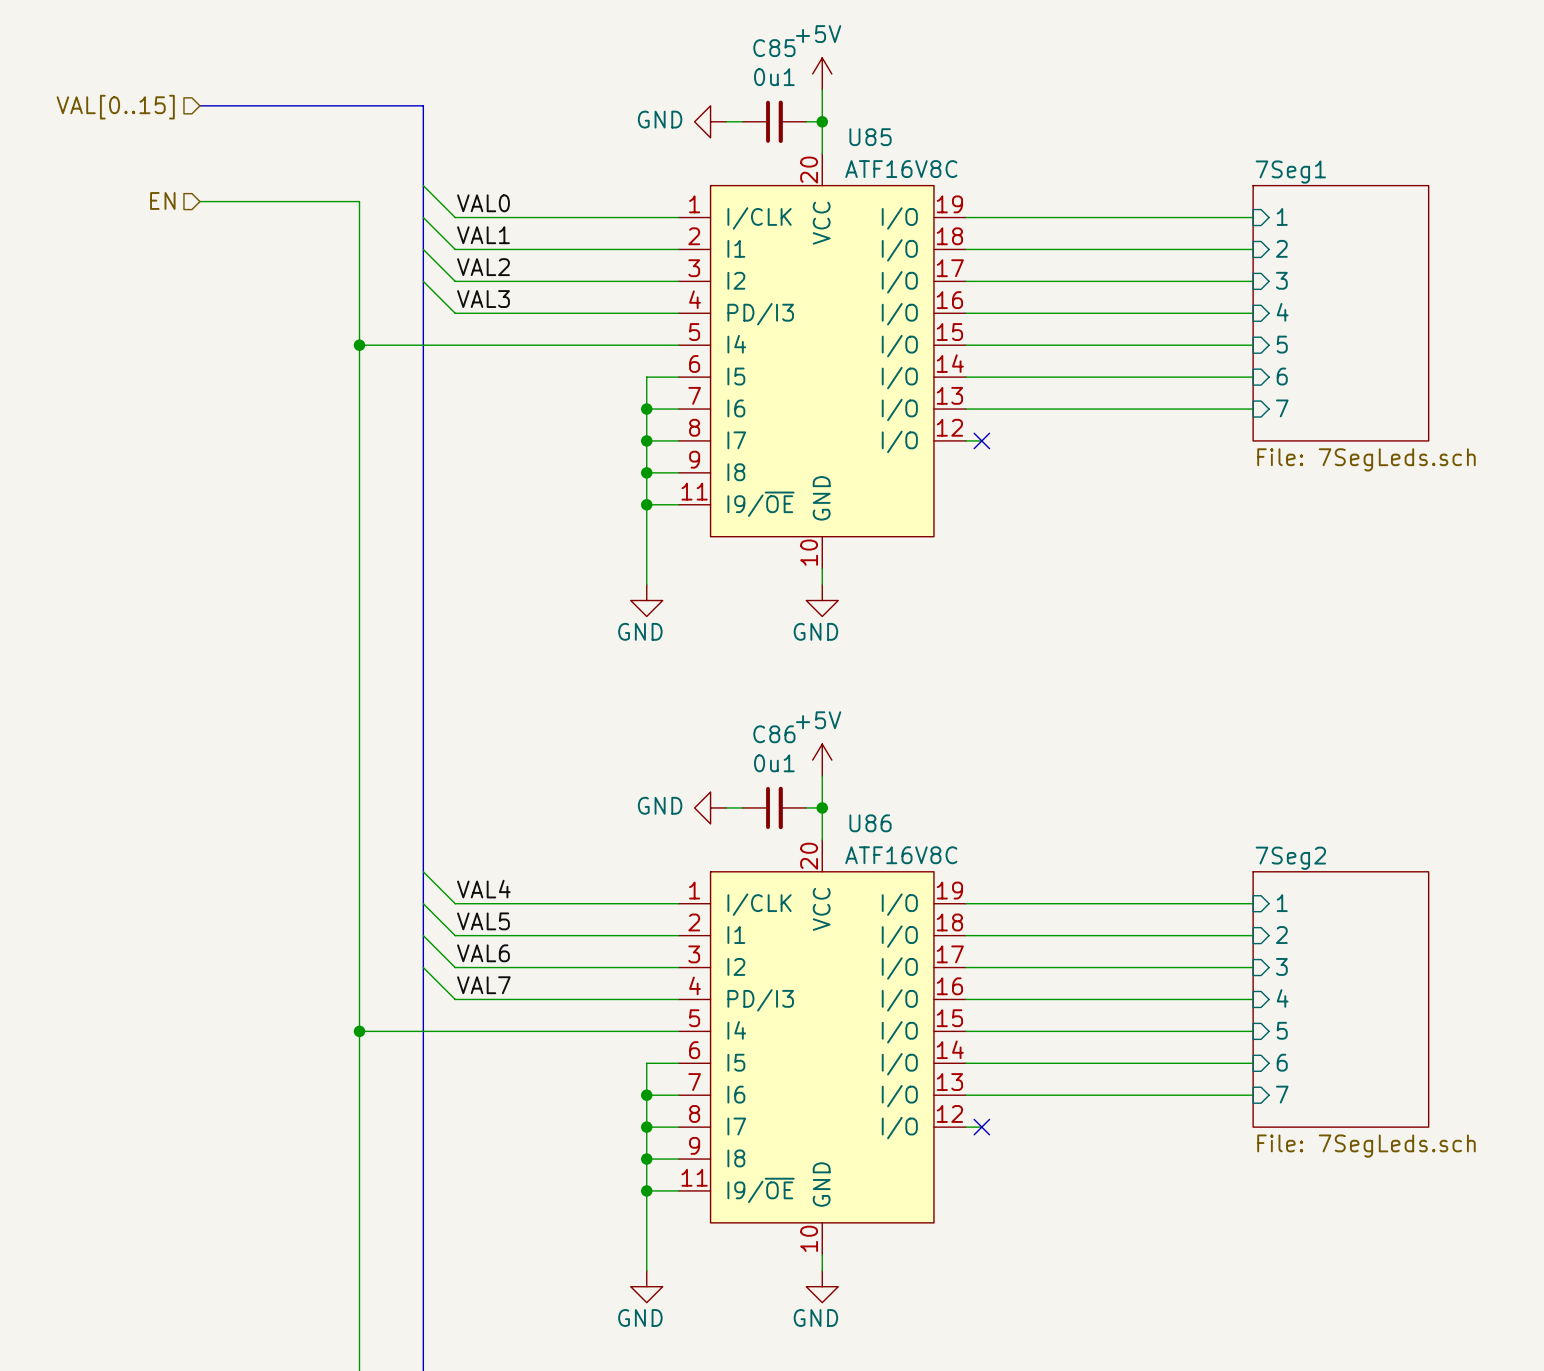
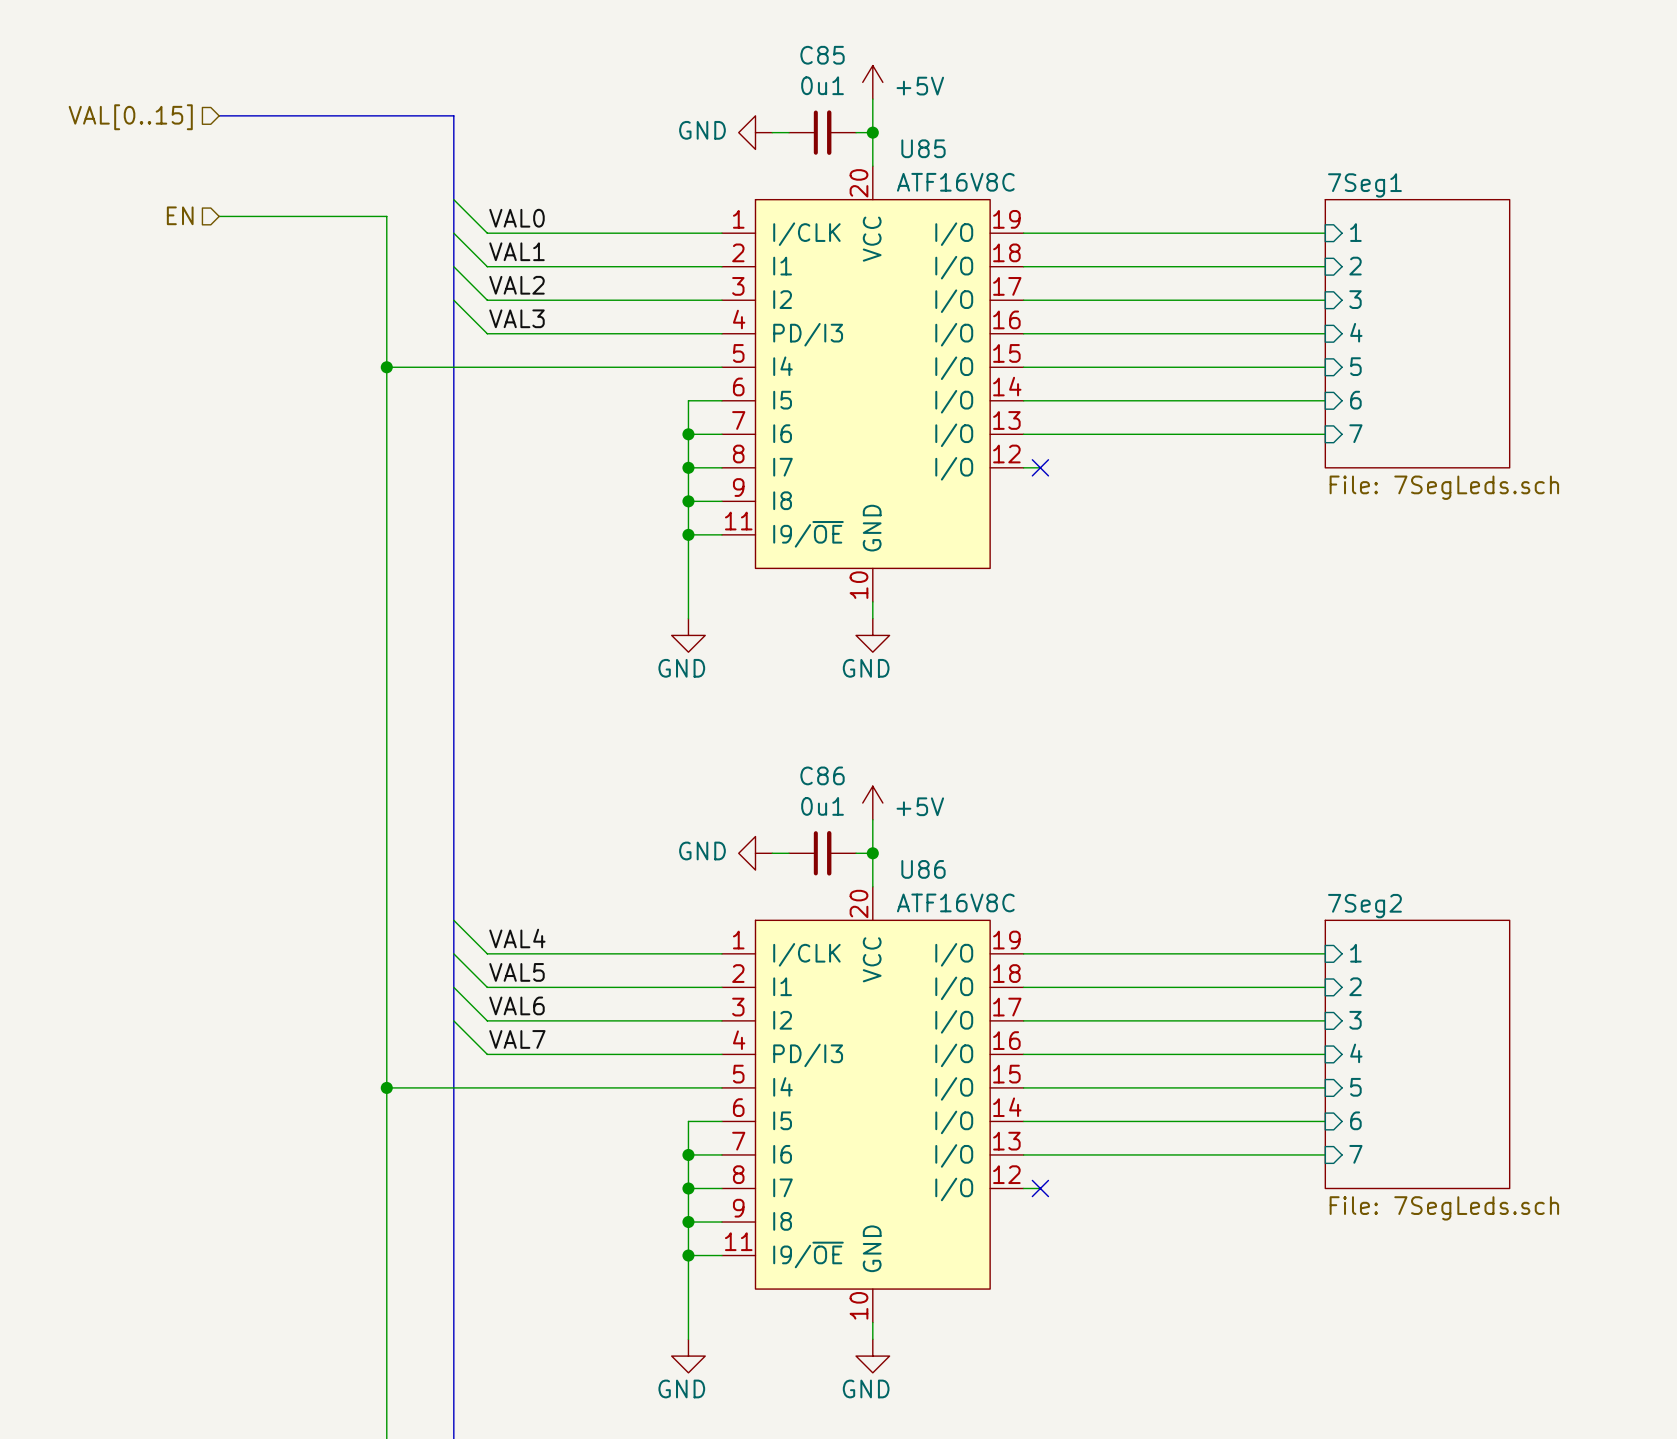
power symbol text position: +5V (818, 34) -> +5V (920, 86)
power symbol text position: +5V (818, 720) -> +5V (920, 806)

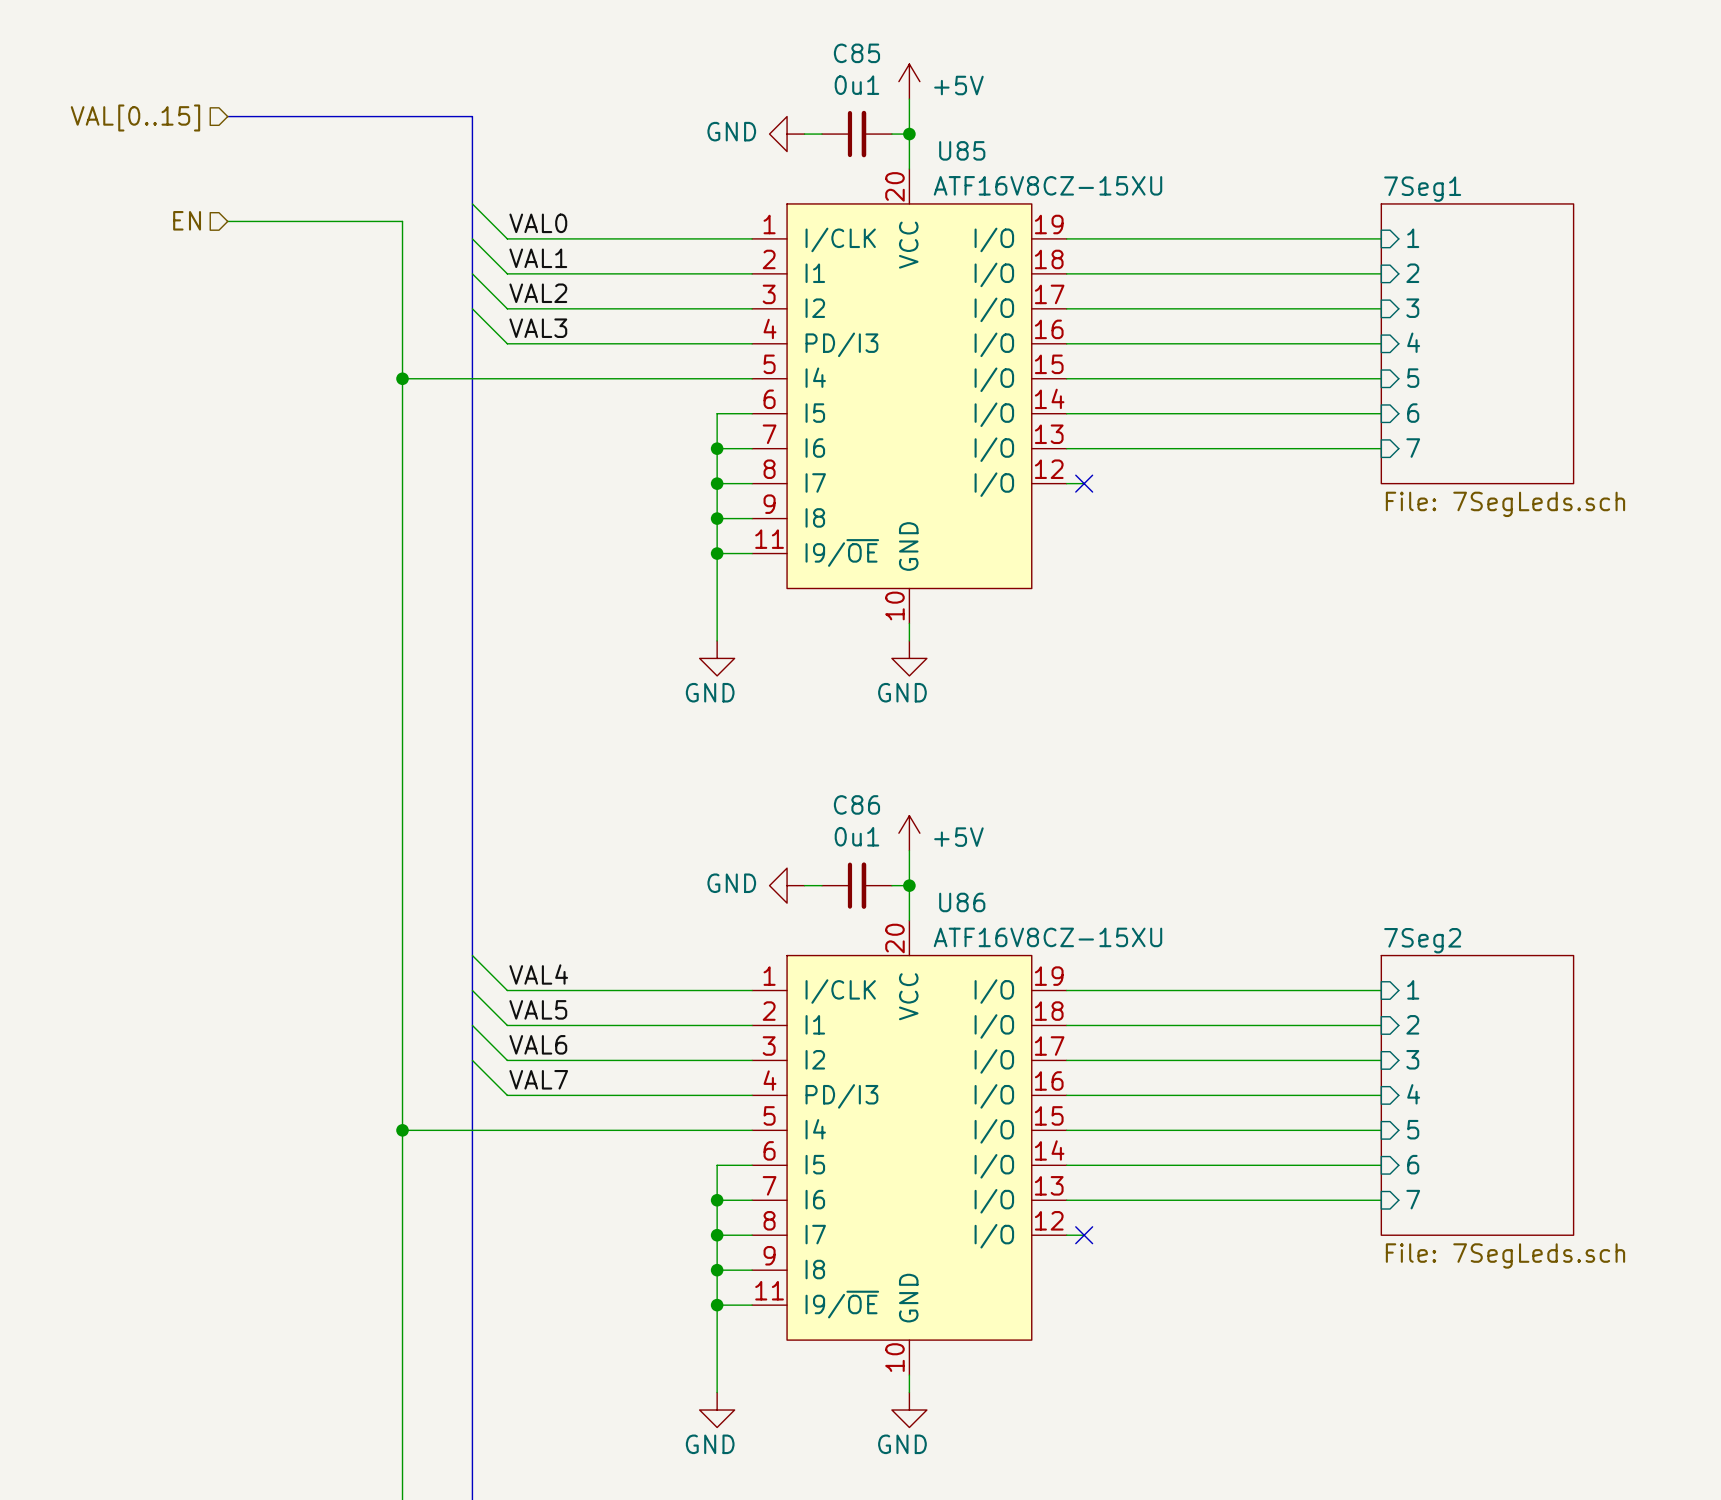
U85 value: ATF16V8C (955, 182) -> ATF16V8CZ-15XU (1047, 185)
U86 value: ATF16V8C (955, 902) -> ATF16V8CZ-15XU (1047, 937)

